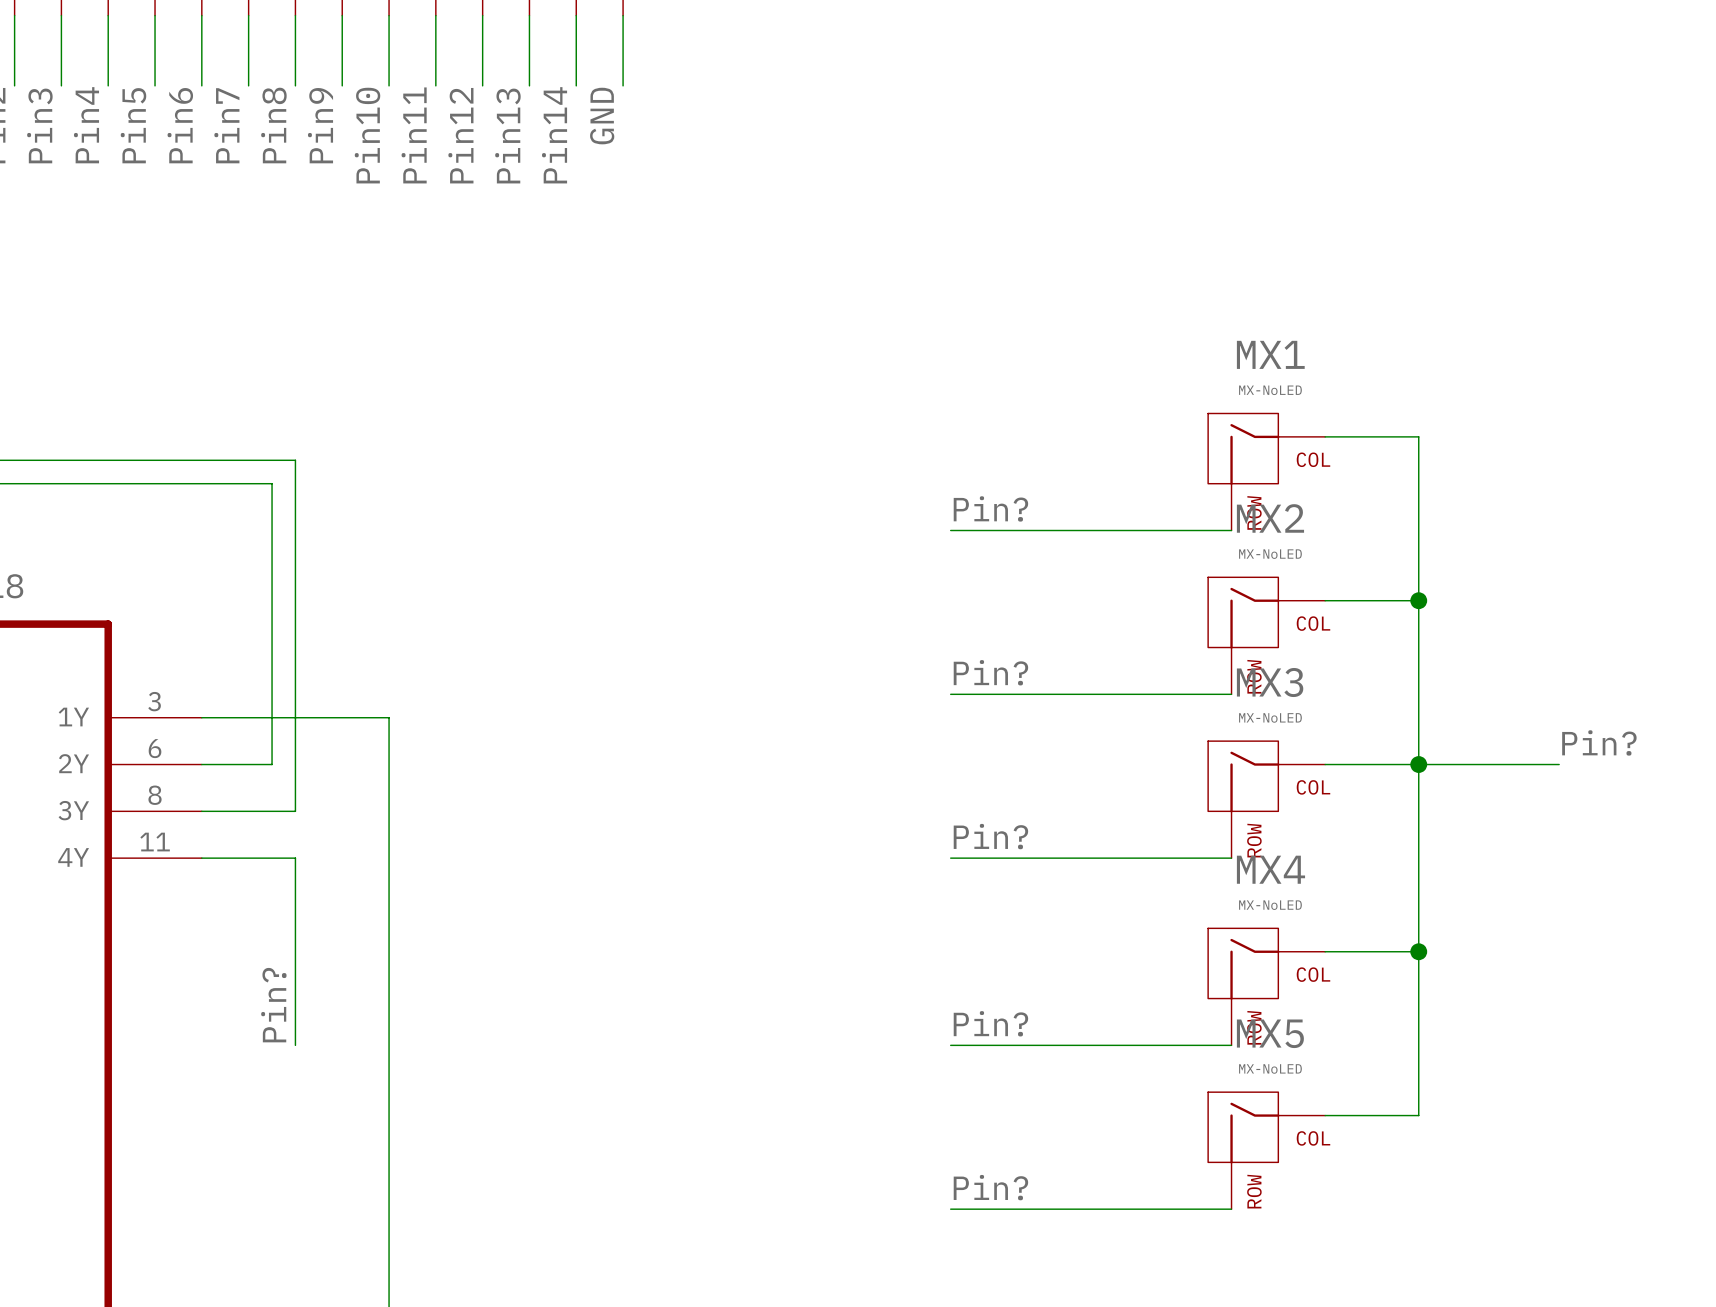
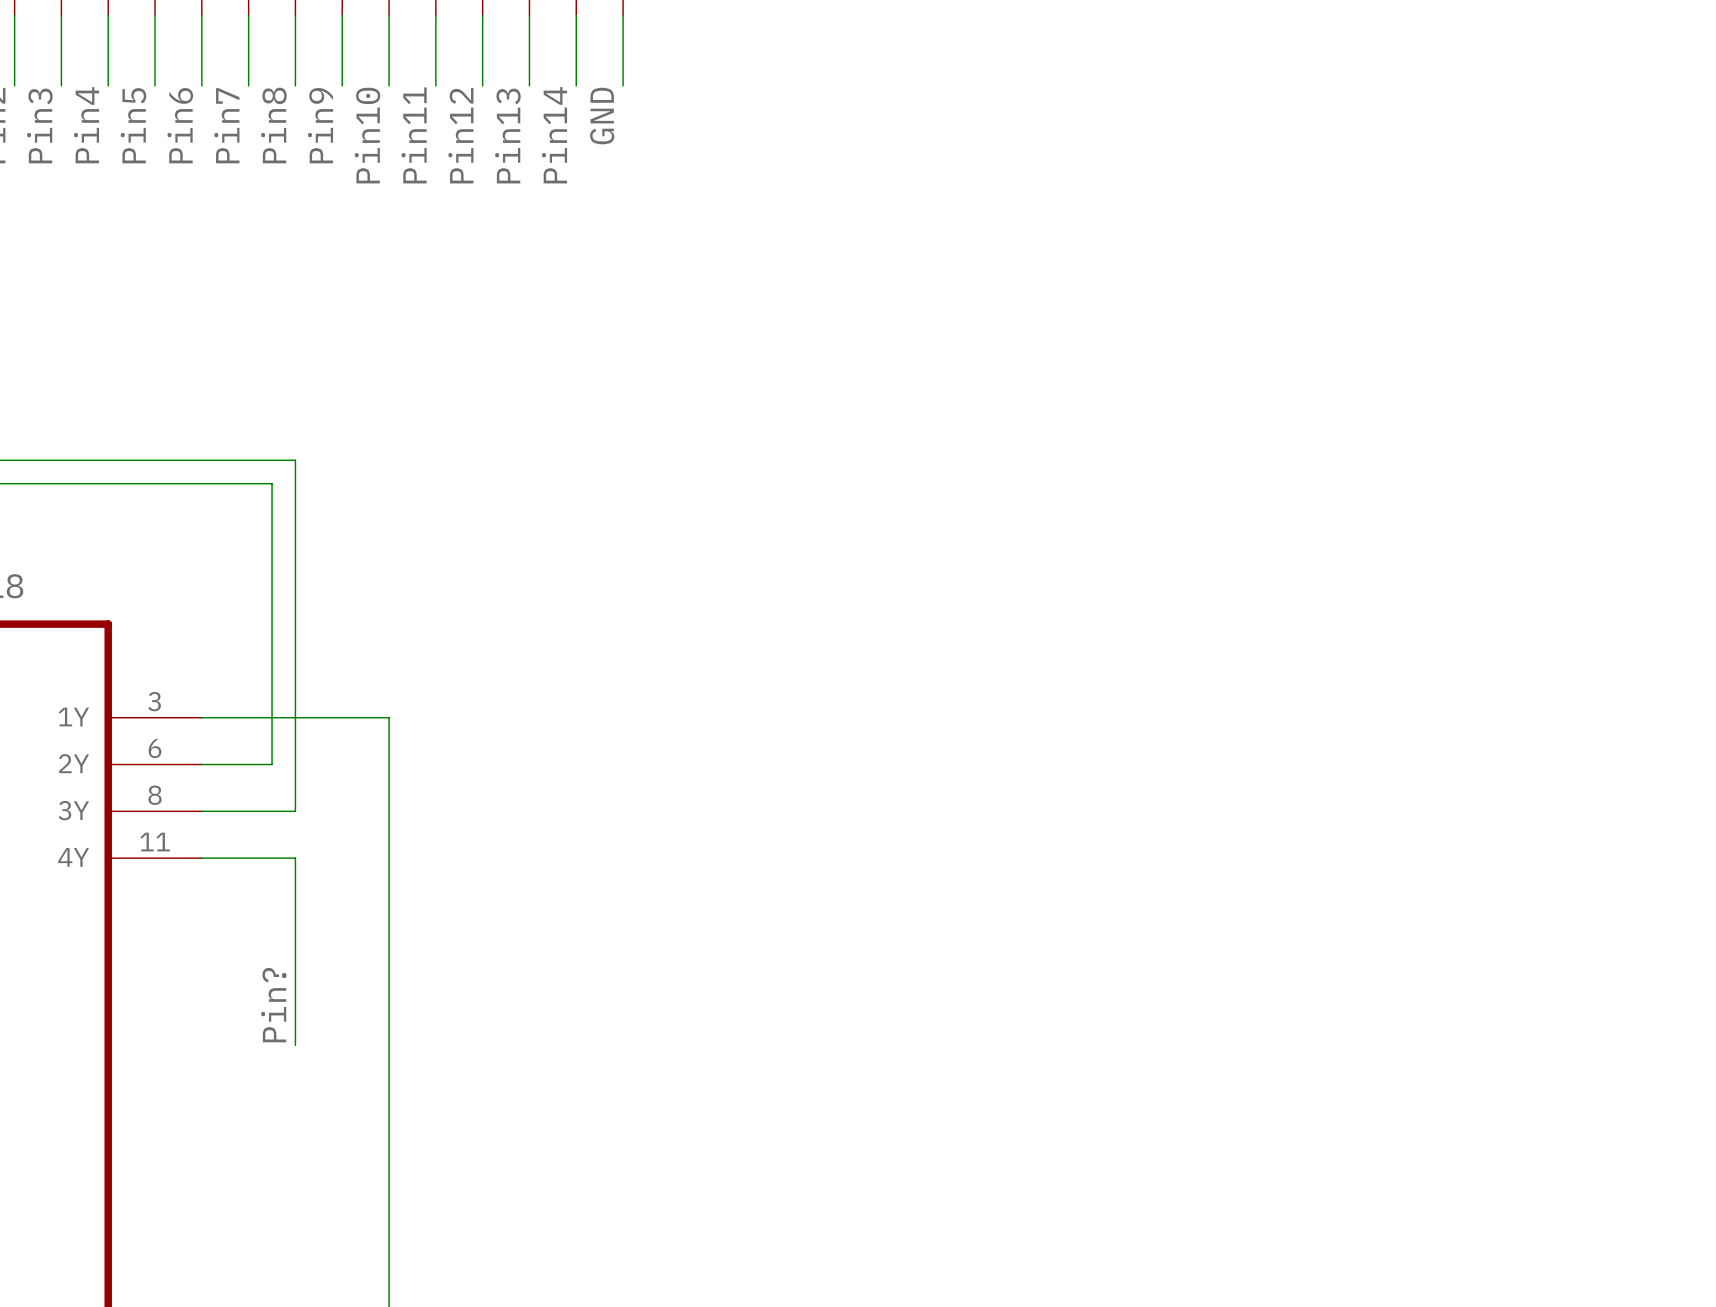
wire: (1325, 436) (1418, 436) (1418, 1115) (1325, 1115) -> none
MX1: MX-NoLED (1266, 472) -> none
label: Pin? (990, 508) -> none
wire: (950, 530) (1231, 530) -> none
wire: (1325, 600) (1418, 600) -> none
junction: (1418, 600) -> none
MX2: MX-NoLED (1266, 635) -> none
label: Pin? (990, 672) -> none
wire: (950, 694) (1231, 694) -> none
label: Pin? (1599, 742) -> none
wire: (1325, 764) (1559, 764) -> none
junction: (1418, 764) -> none
MX3: MX-NoLED (1266, 799) -> none
label: Pin? (990, 836) -> none
wire: (950, 858) (1231, 858) -> none
wire: (1325, 951) (1418, 951) -> none
junction: (1418, 951) -> none
MX4: MX-NoLED (1266, 986) -> none
label: Pin? (990, 1023) -> none
wire: (950, 1045) (1231, 1045) -> none
MX5: MX-NoLED (1266, 1150) -> none
label: Pin? (990, 1187) -> none
wire: (950, 1209) (1231, 1209) -> none

